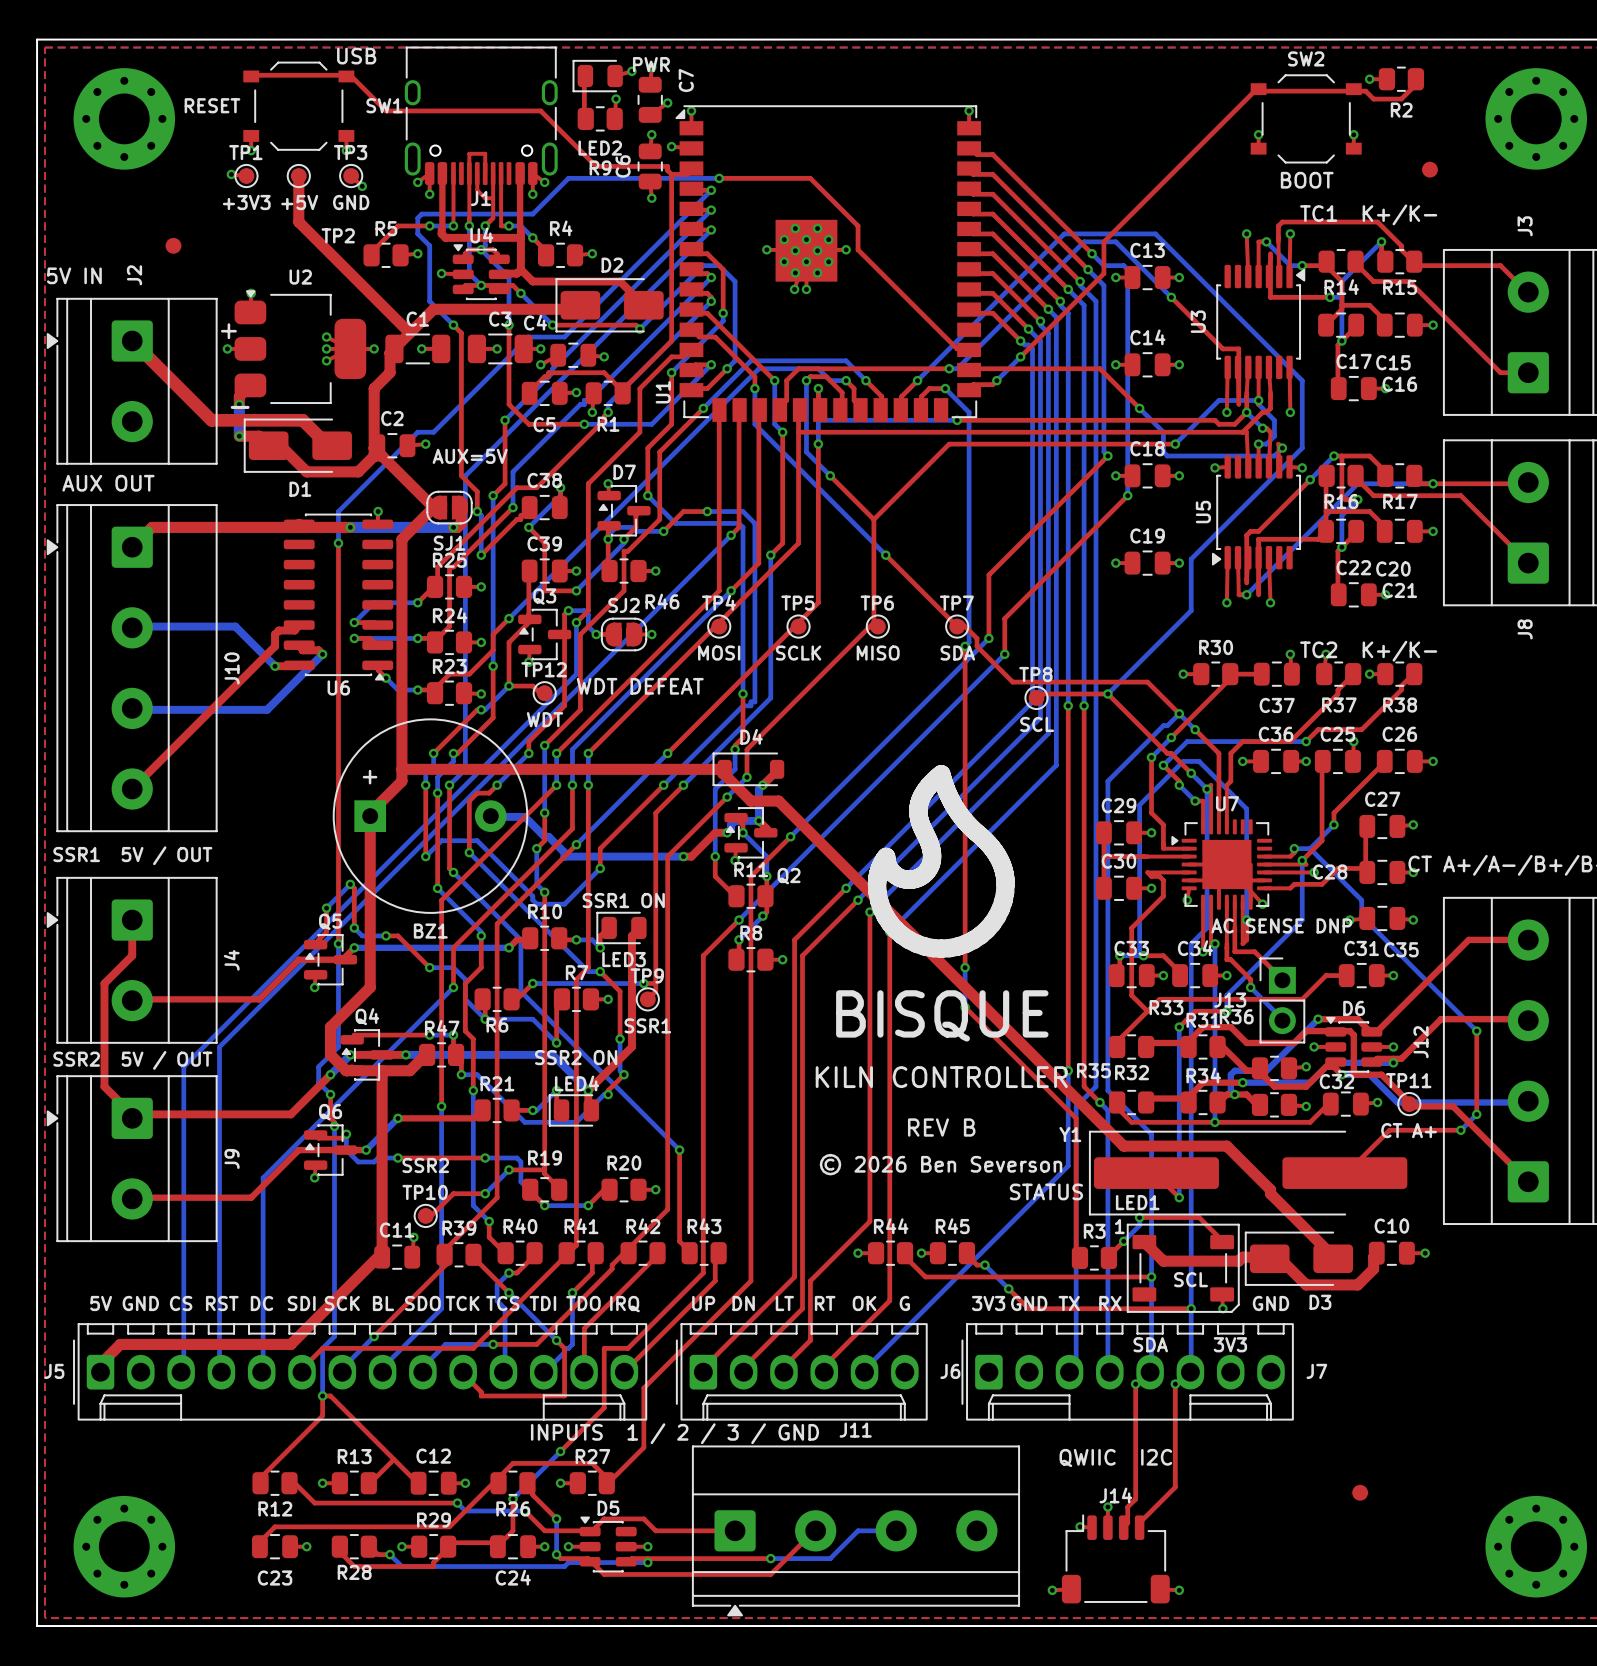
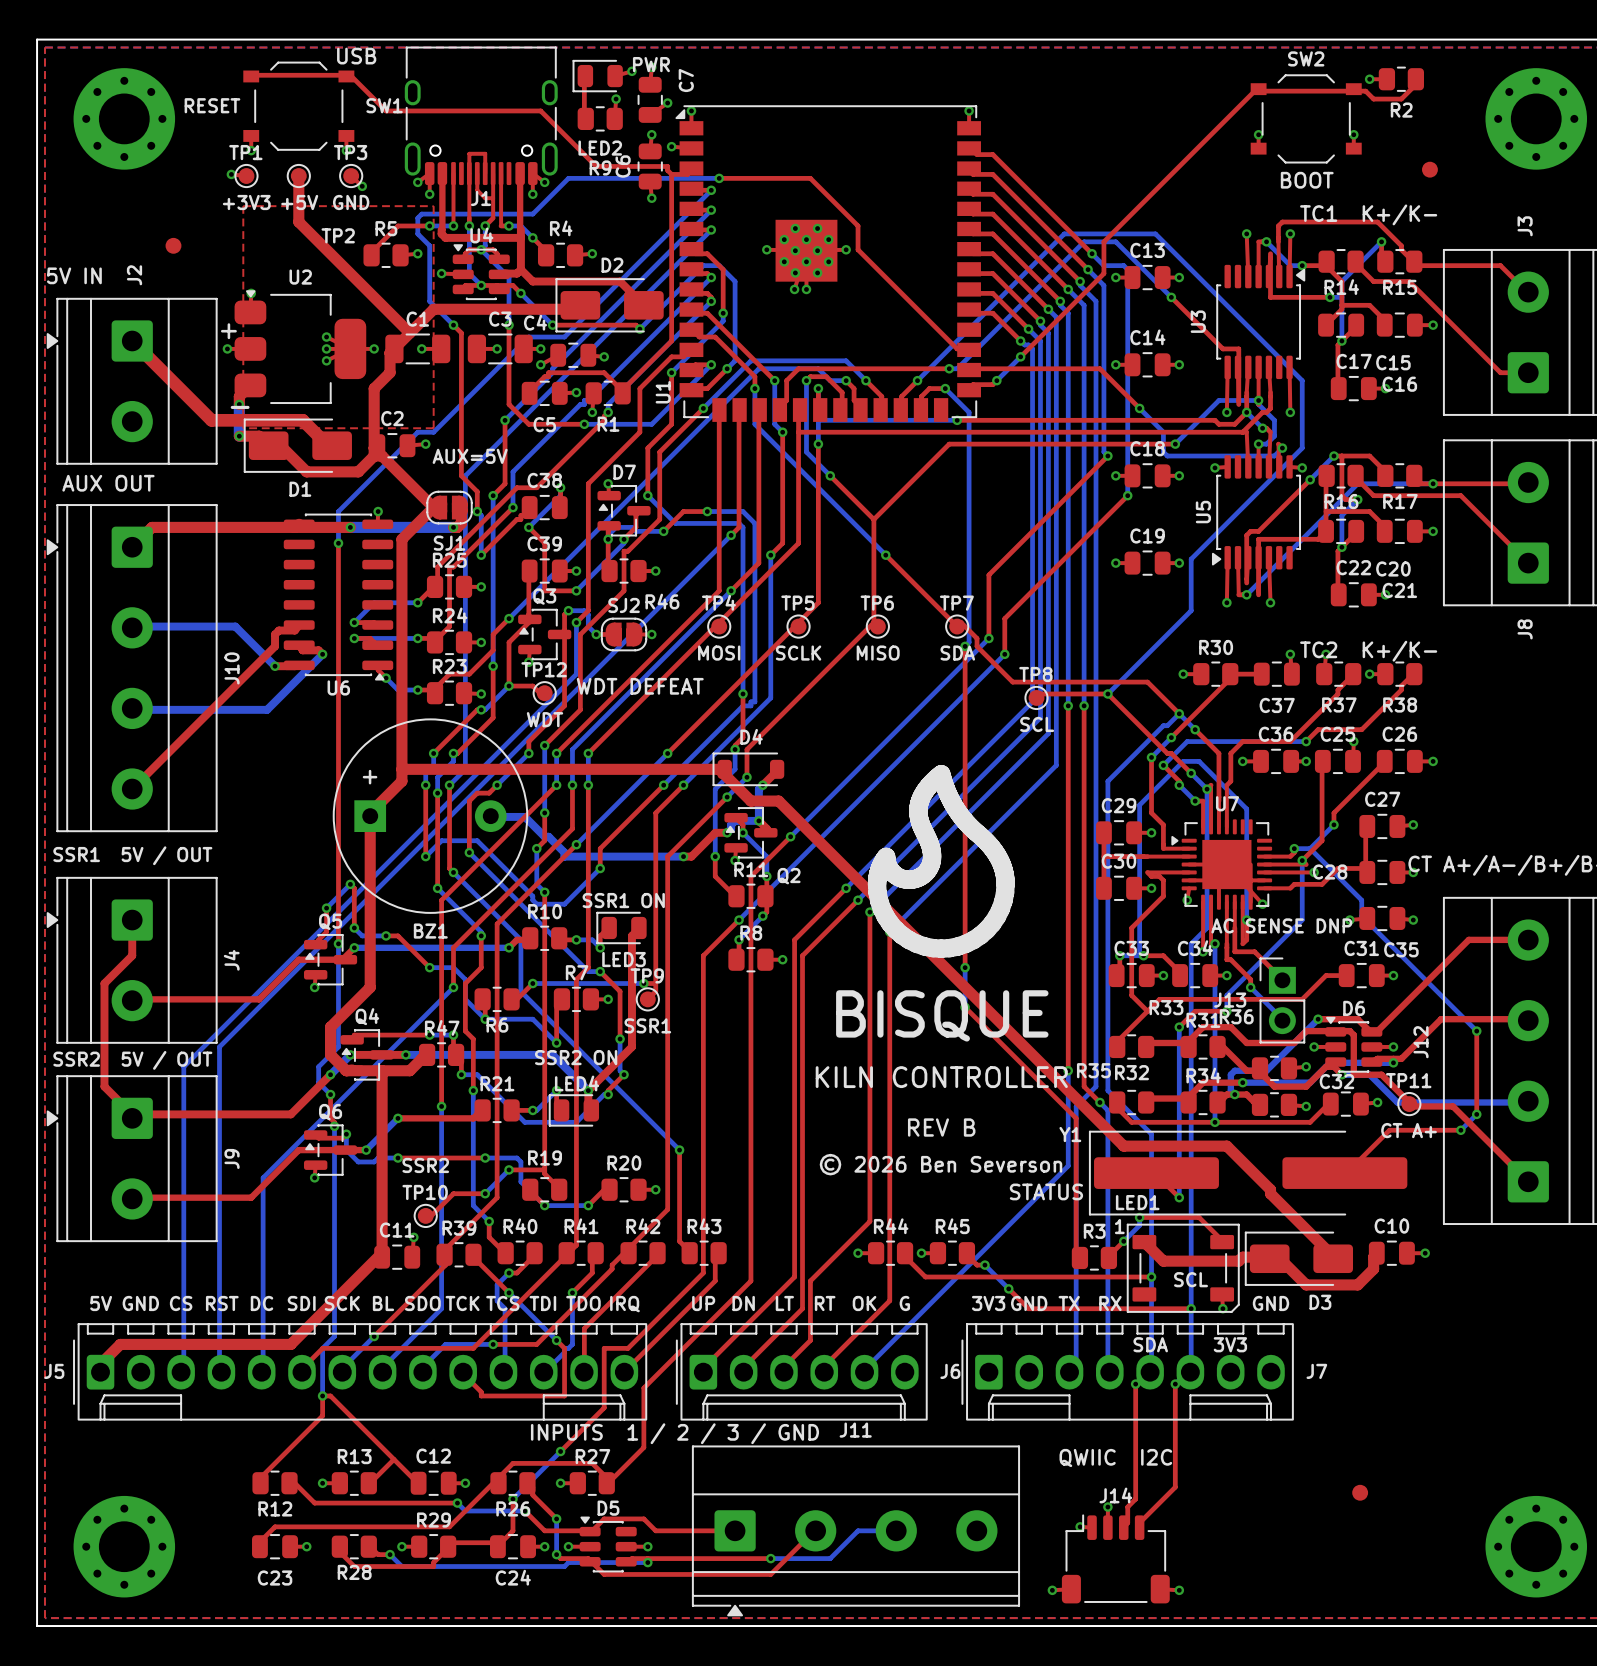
top zone outline: none -> (243, 206) (433, 206) (433, 428) (243, 428) (243, 206)

